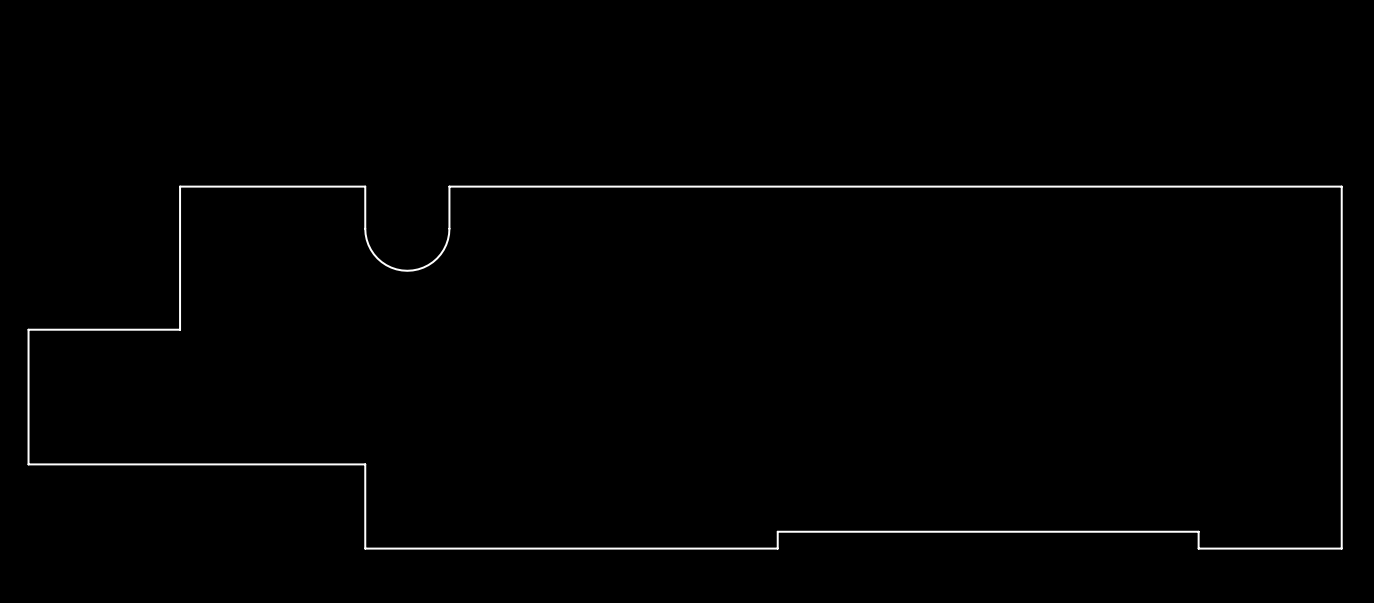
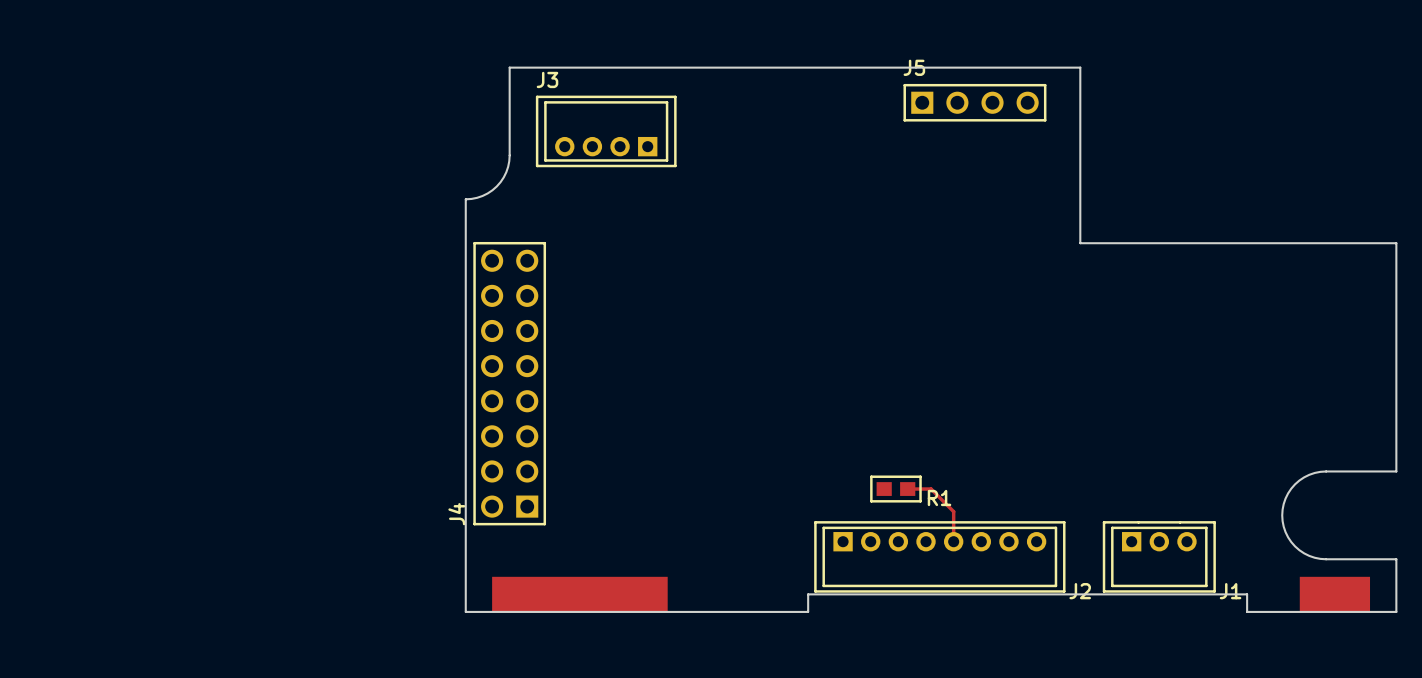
J5: none -> (974, 102)
J3: none -> (606, 131)
board edge: (449, 186) (1341, 186) (1341, 195) -> (465, 234) (465, 199) (482, 195) (492, 190) (503, 177) (508, 166) (509, 67) (1080, 67) (1080, 243) (1396, 243)
board edge: (449, 228) (446, 244) (432, 262) (418, 269) (401, 270) (381, 262) (368, 244) (365, 228) (365, 186) (180, 186) (180, 329) (28, 329) (28, 464) (365, 464) (365, 548) (449, 548) -> (465, 278) (465, 611)
J4: none -> (509, 383)
board edge: (1341, 413) (1341, 498) -> (1396, 471) (1326, 471) (1309, 474) (1291, 488) (1285, 498) (1282, 515) (1288, 537) (1299, 550) (1309, 555) (1326, 559) (1396, 559)
R1: none -> (895, 489)
track: none -> (907, 489) (931, 489) (953, 511) (953, 541)
J2: none -> (939, 556)
J1: none -> (1159, 556)
part: none -> (579, 594)
part: none -> (1334, 594)

